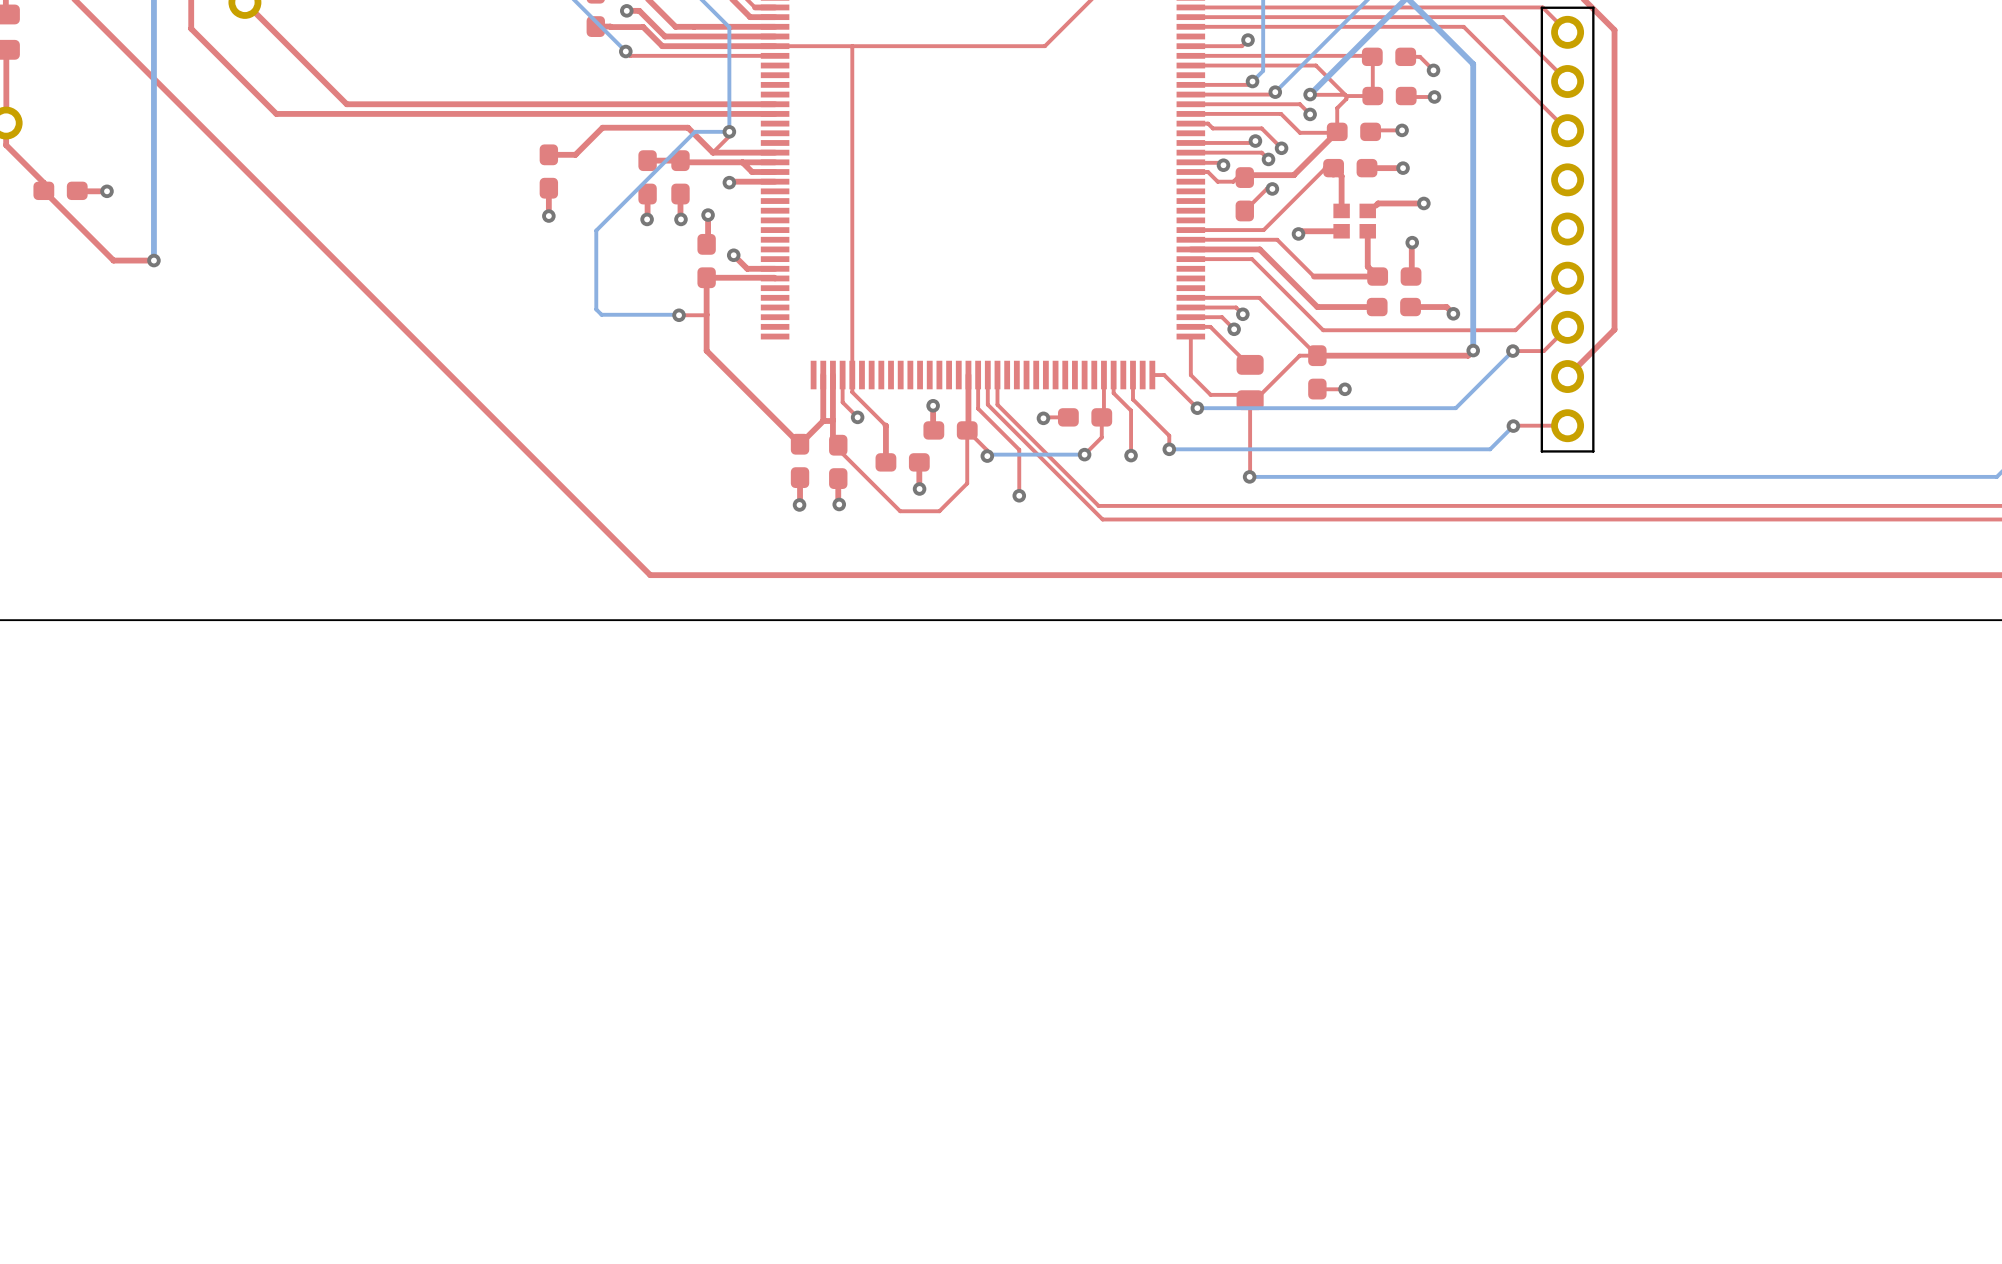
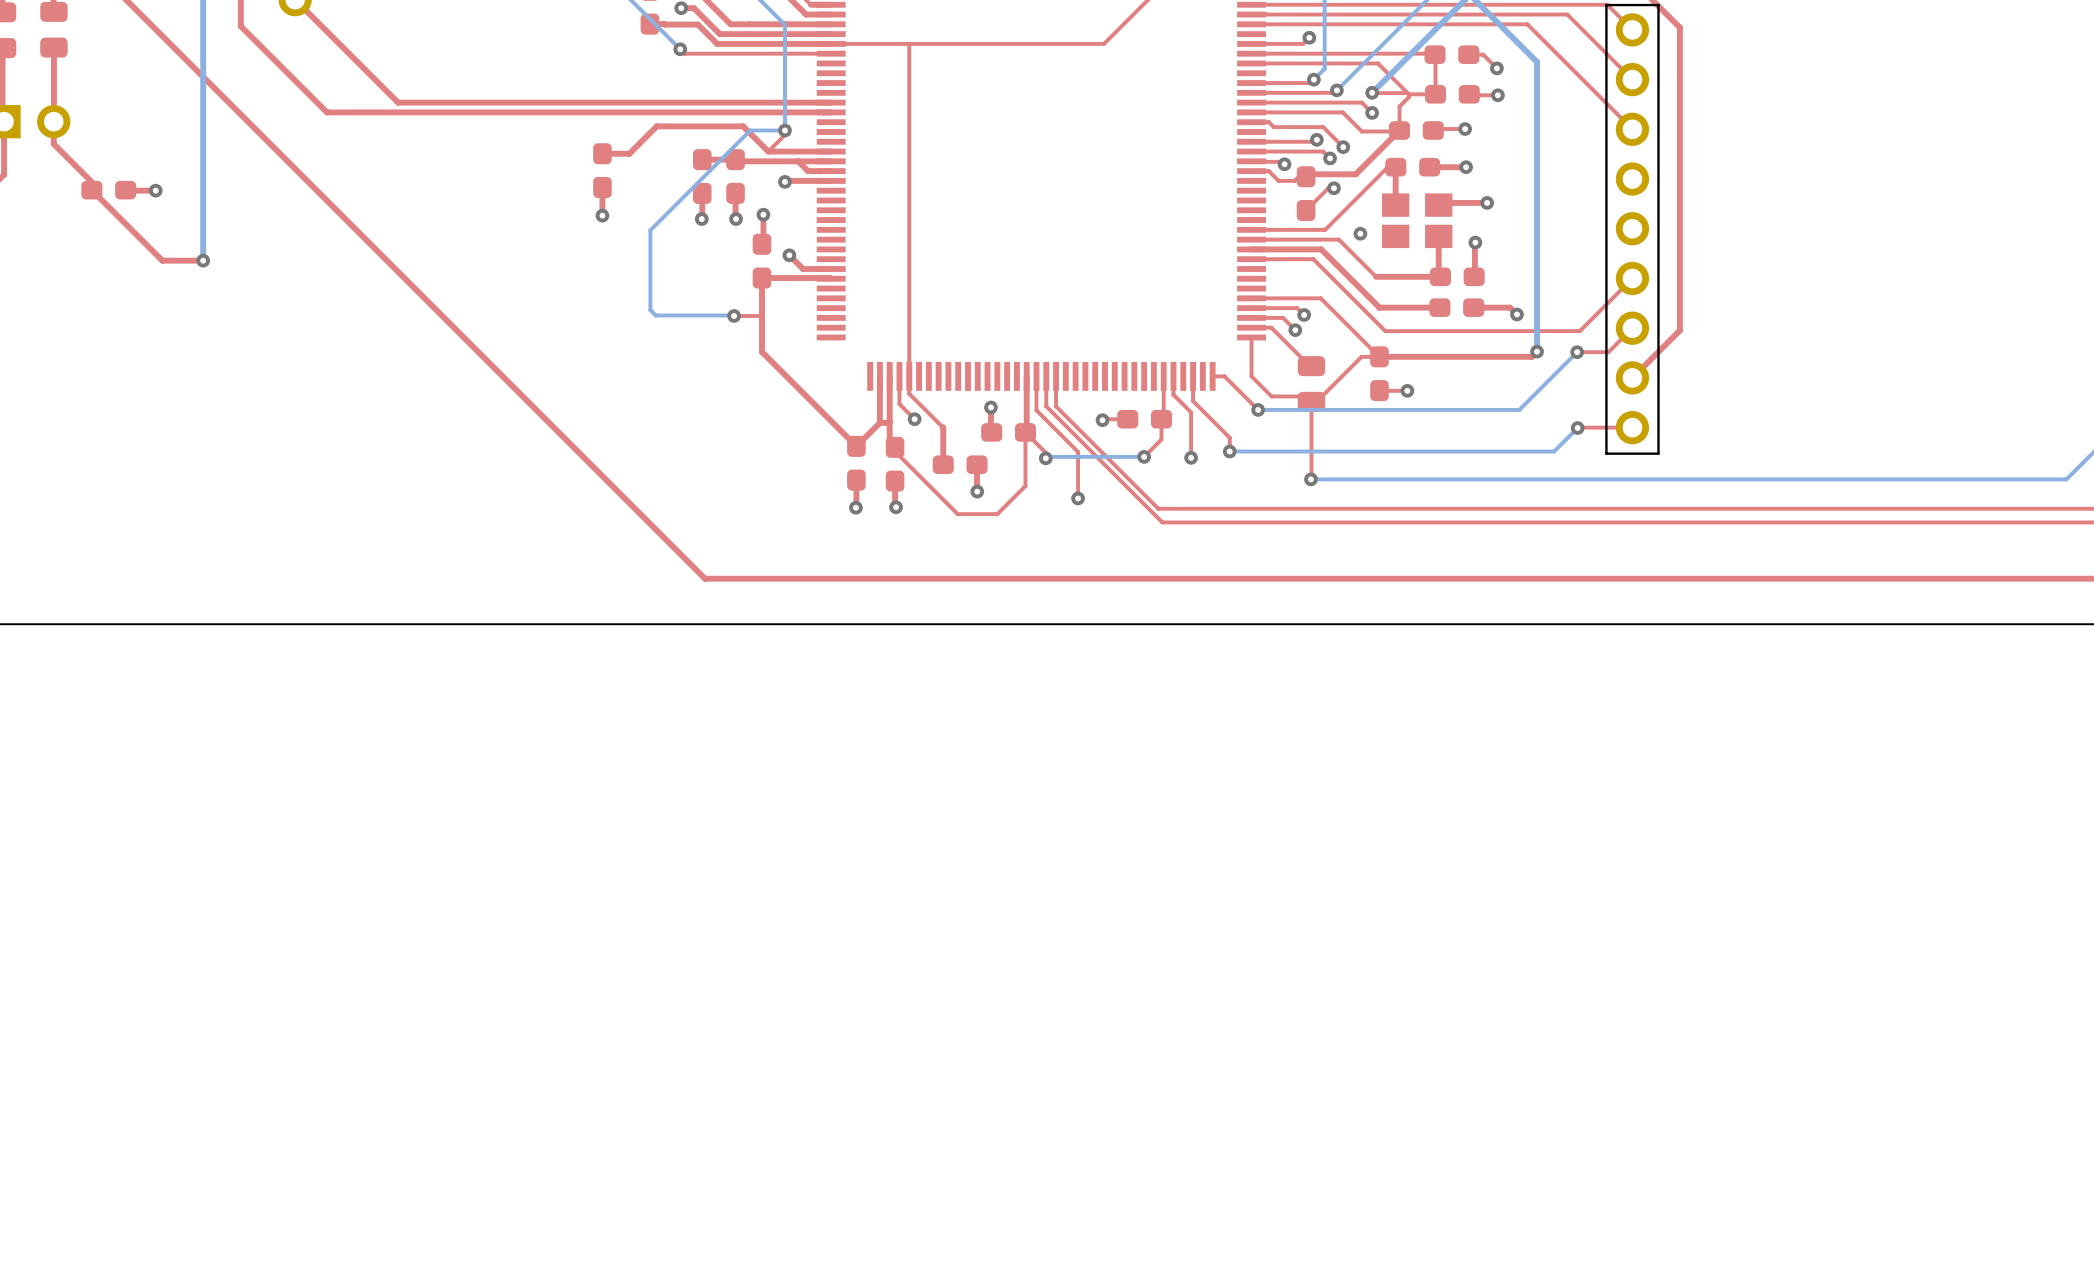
top track: (1333, 168) (1341, 176) (1341, 210) -> none
top track: none -> (1395, 173) (1395, 205)
part footprint: [1333, 203, 1376, 239] -> [1382, 193, 1453, 249]
top track: (1341, 231) (1301, 231) (1298, 233) -> none
top track: (1367, 231) (1367, 266) (1377, 276) -> none
top track: none -> (1438, 236) (1438, 268)

